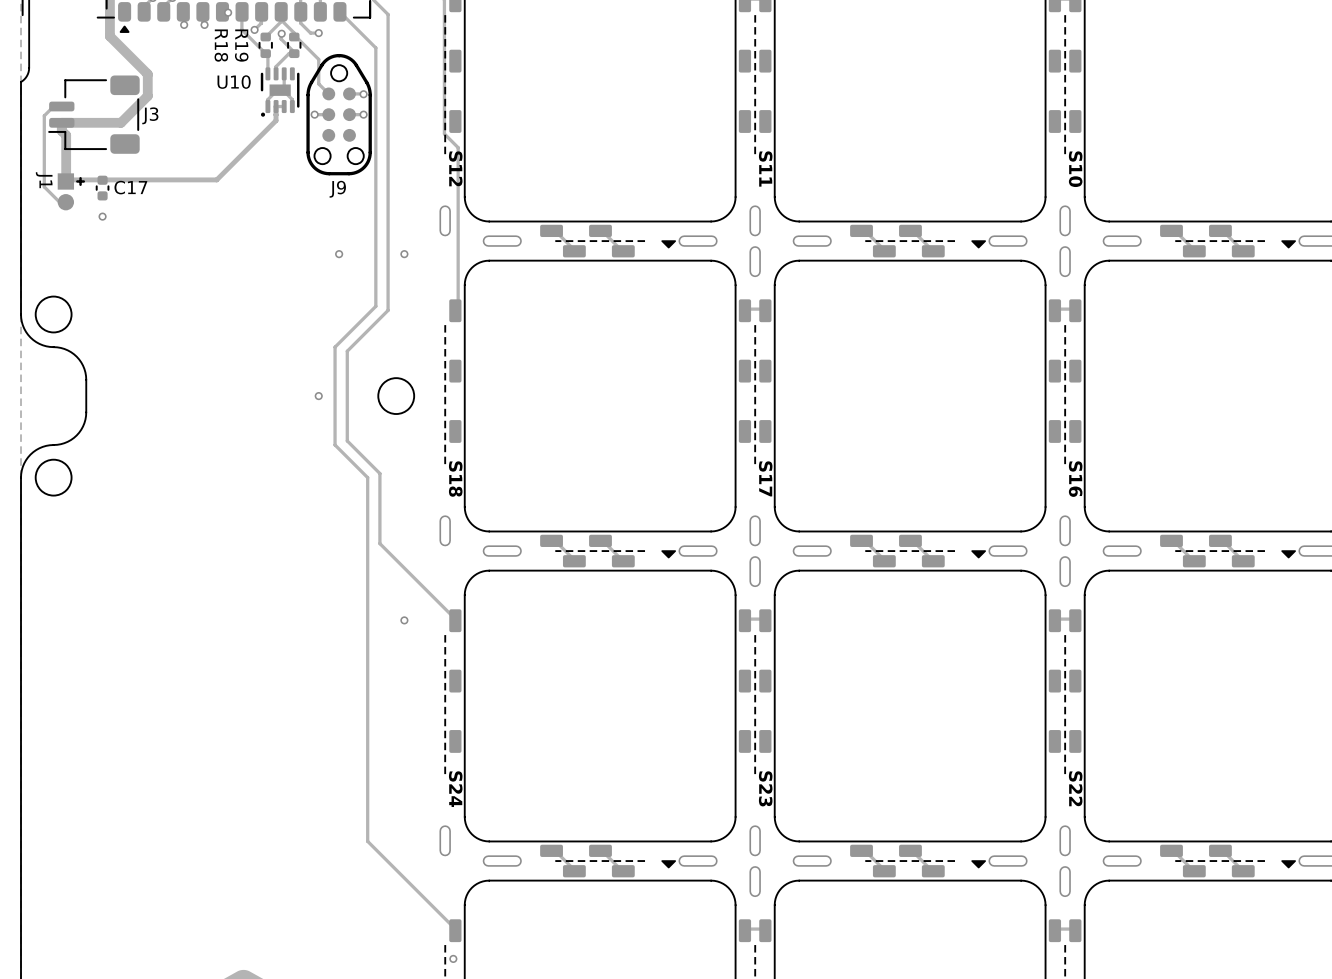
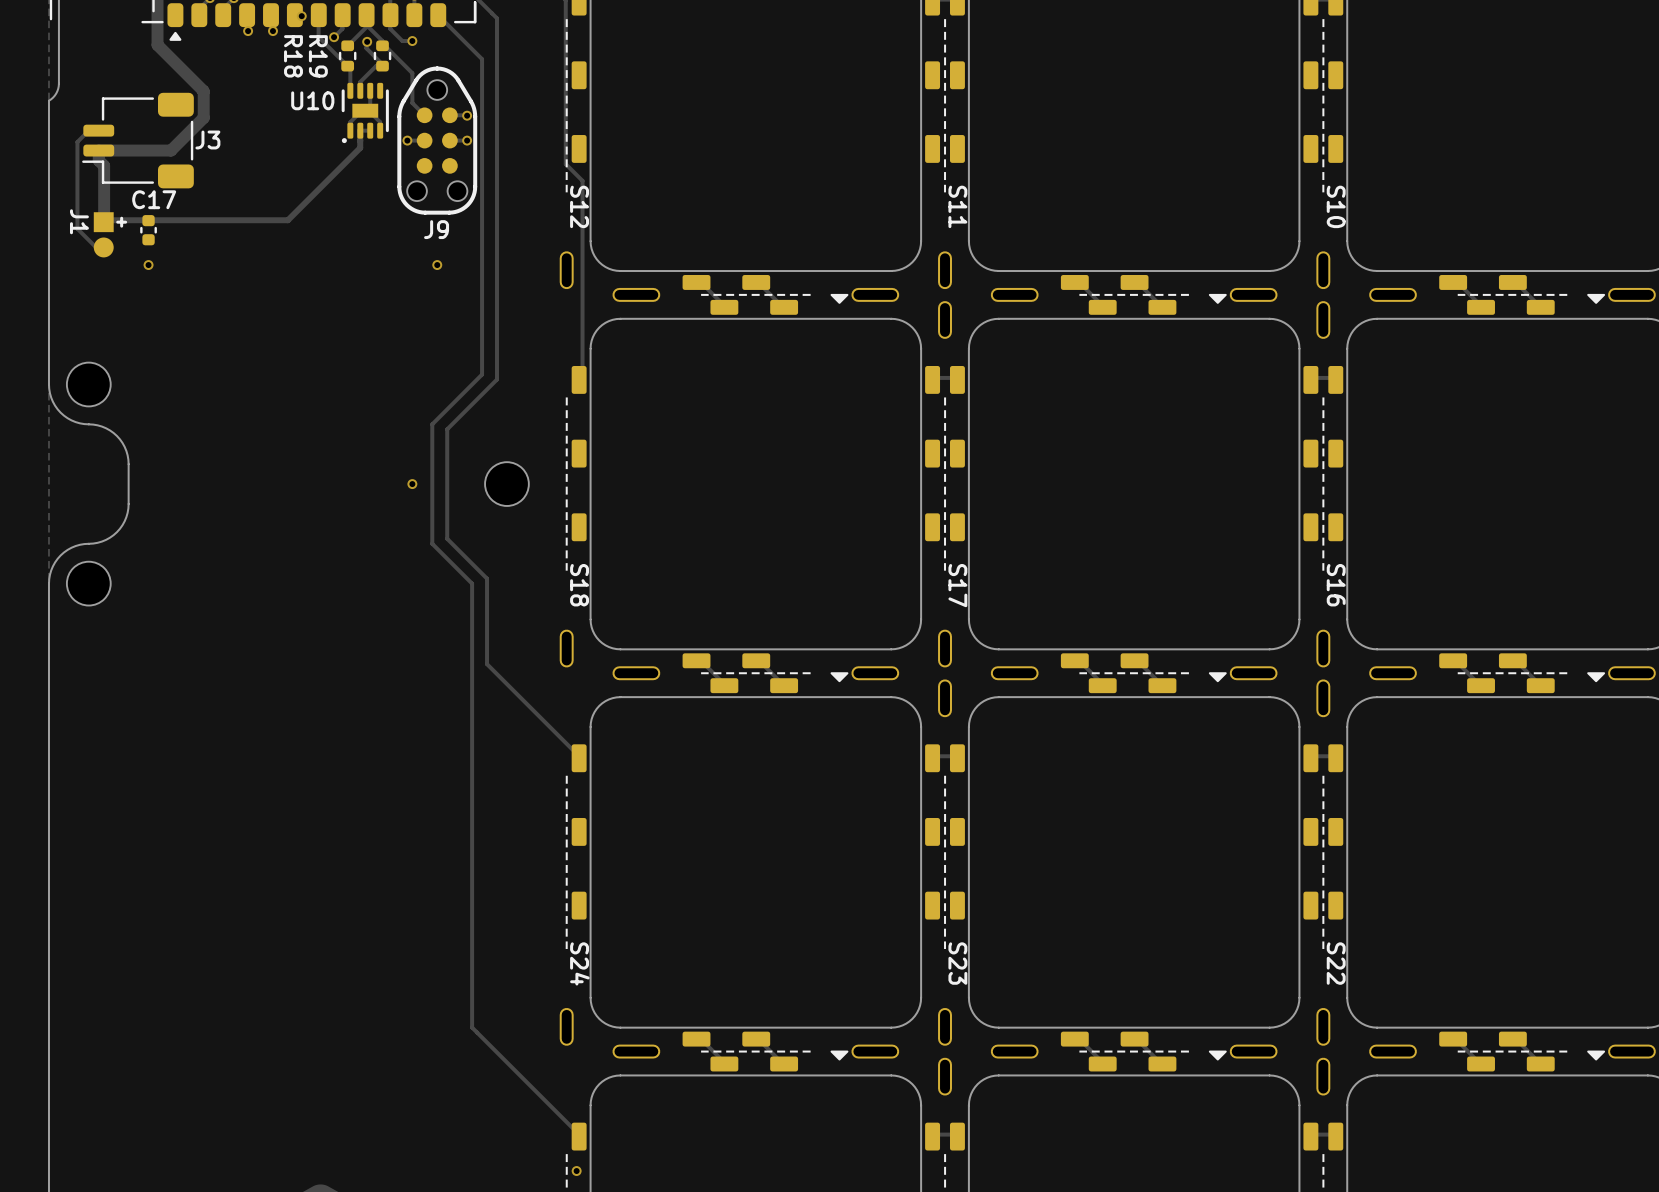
C17 name position: C17 (130, 187) -> C17 (154, 199)
via: none -> (437, 265)
via: (339, 254) -> none
via: (404, 254) -> none
via: (404, 620) -> none

